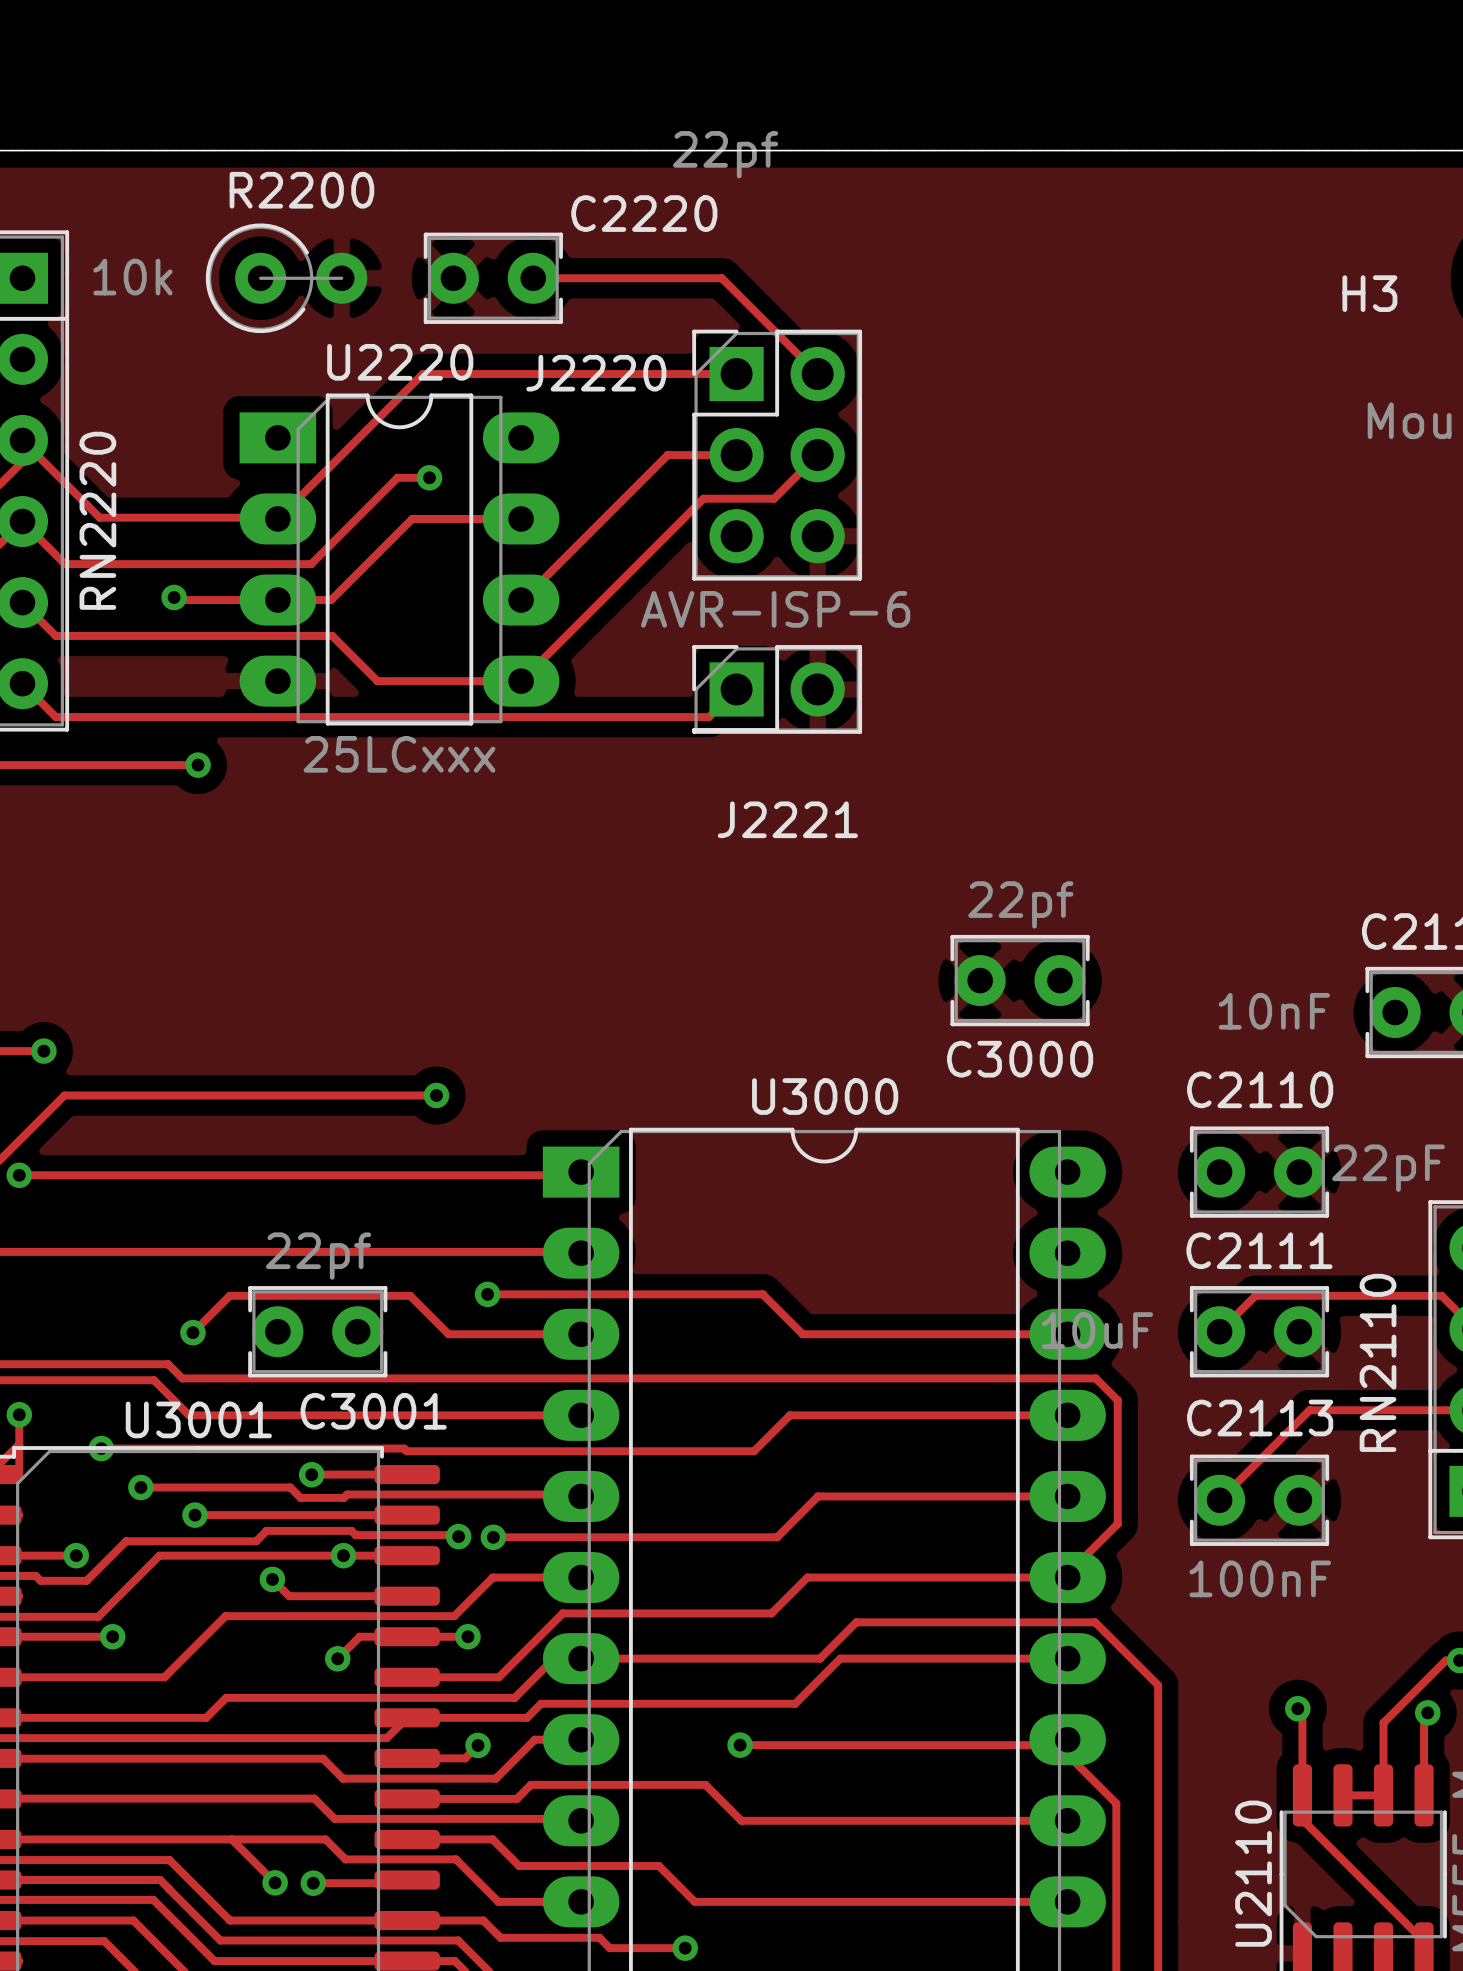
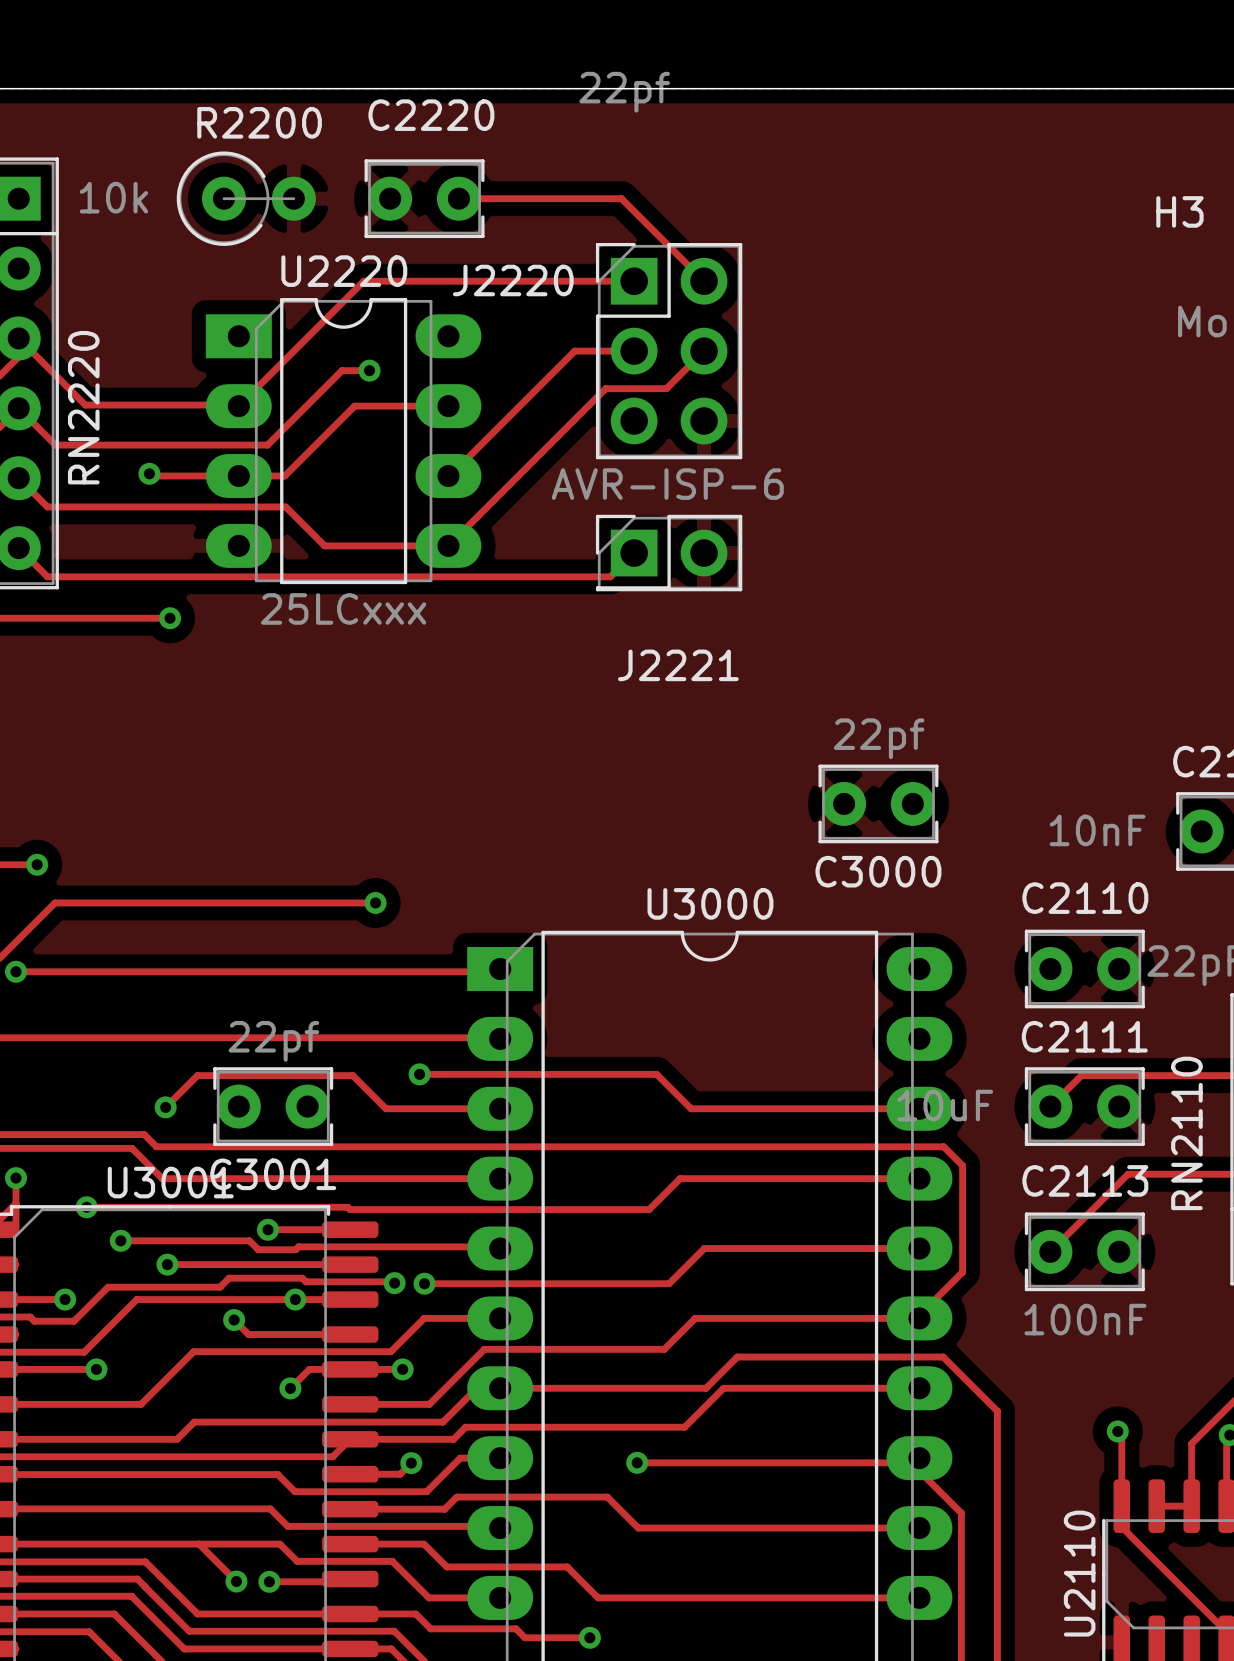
C2220 name position: C2220 (644, 213) -> C2220 (431, 115)
C3001 name position: C3001 (373, 1411) -> C3001 (273, 1174)

